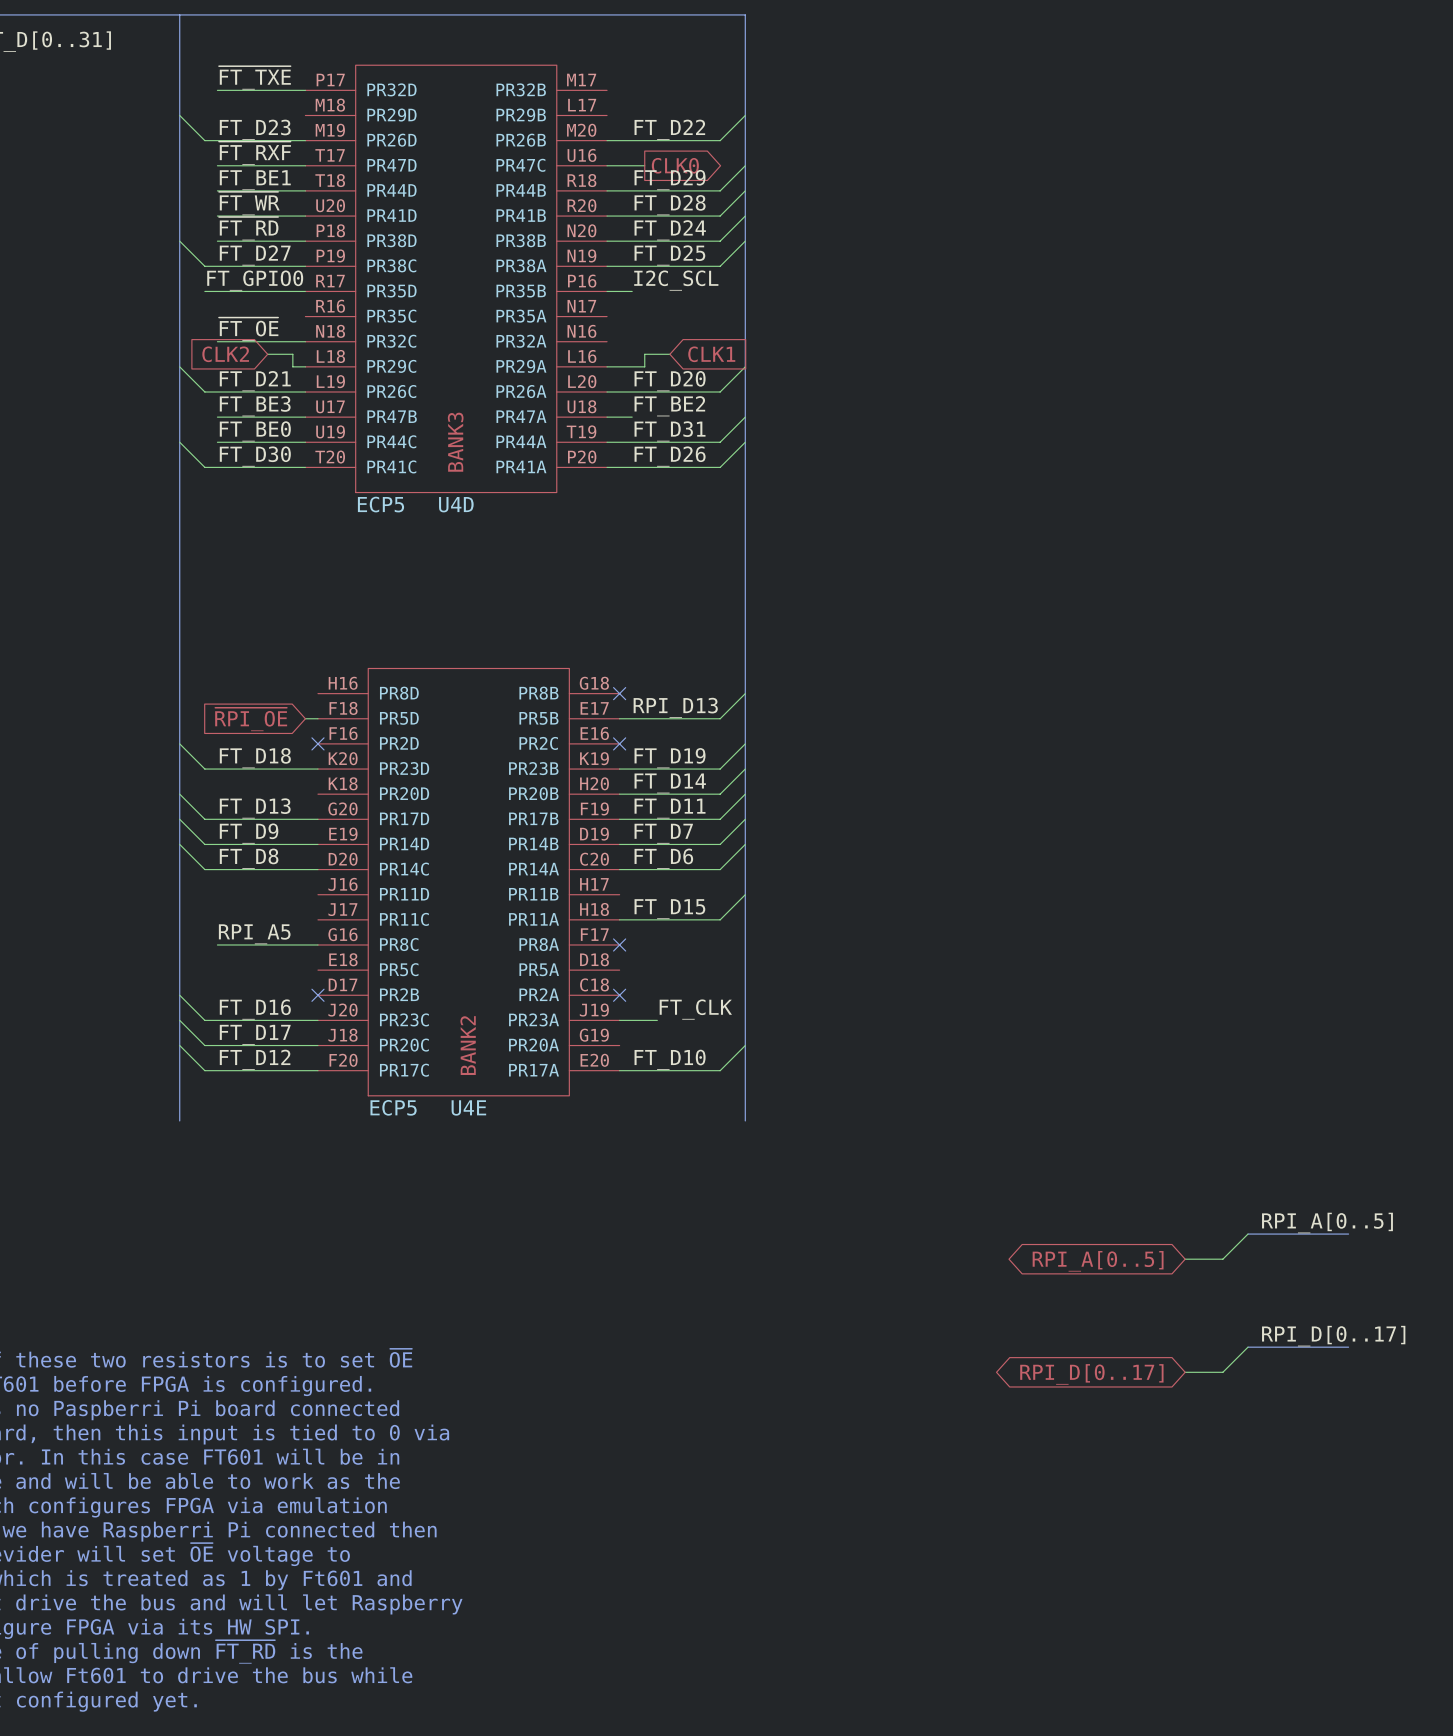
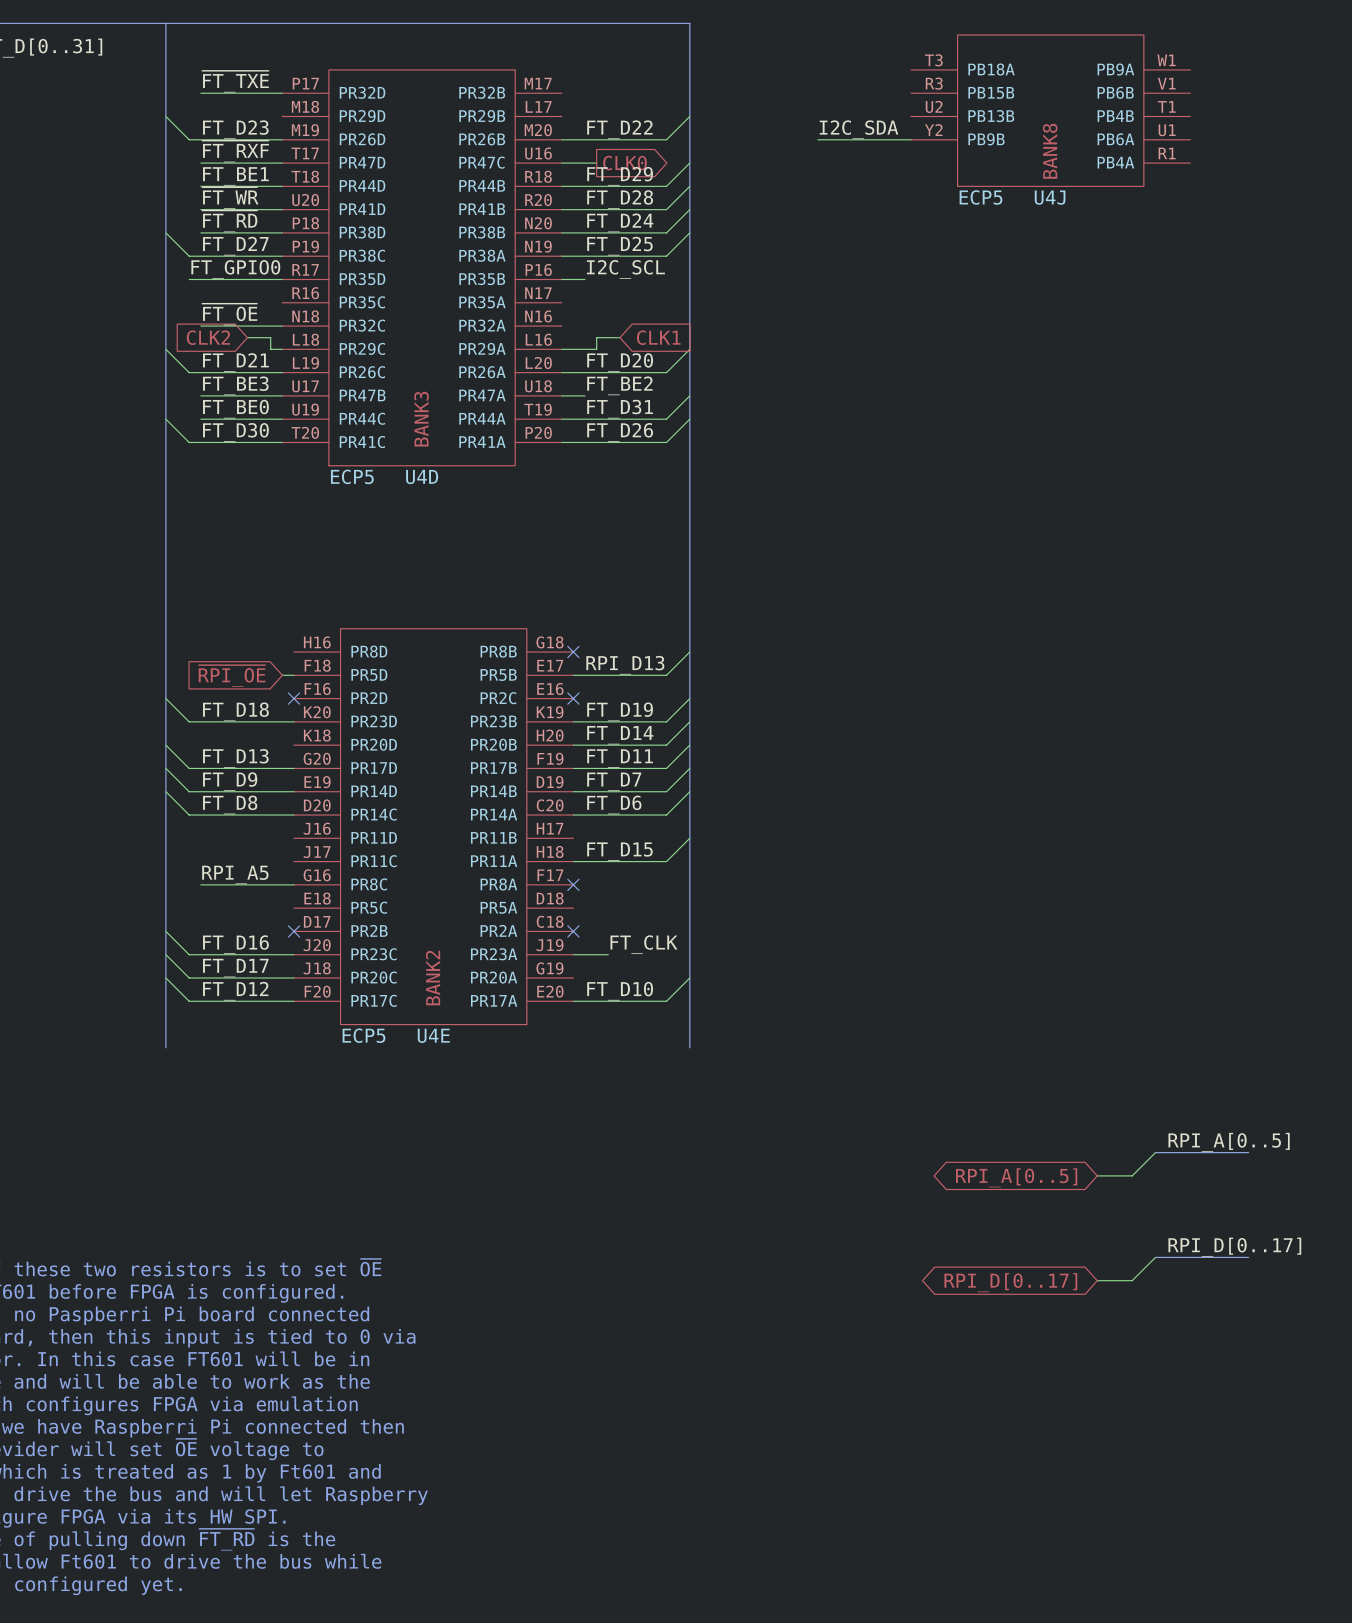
U4J: none -> ECP5 (1050, 110)
label: none -> I2C_SDA (859, 129)
wire: none -> (817, 139) (911, 139)

